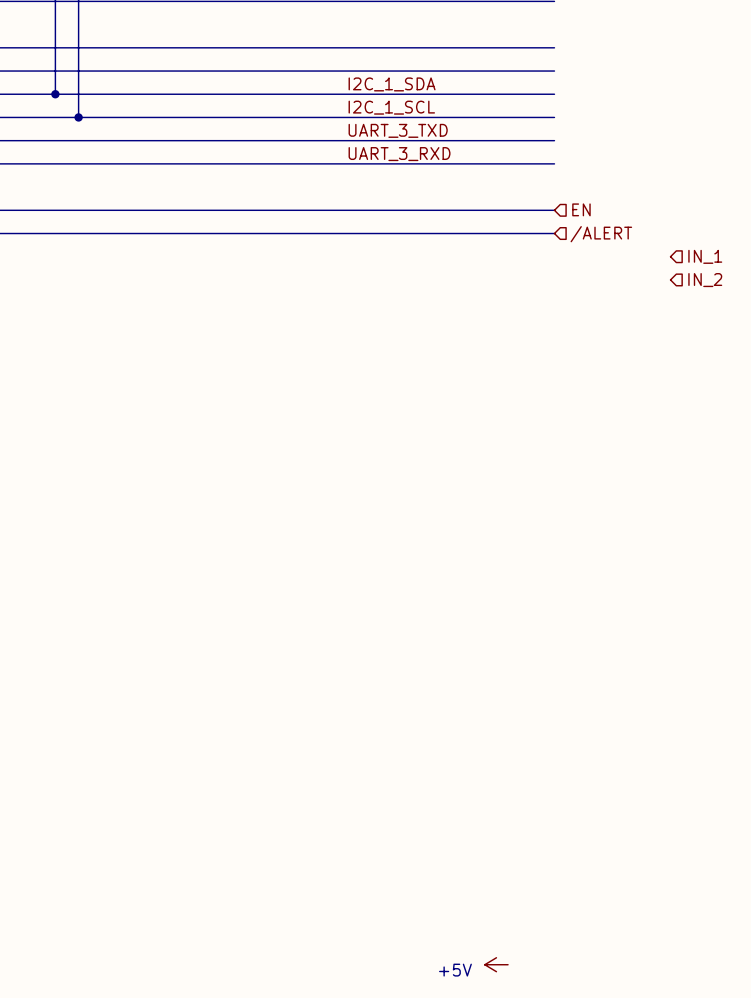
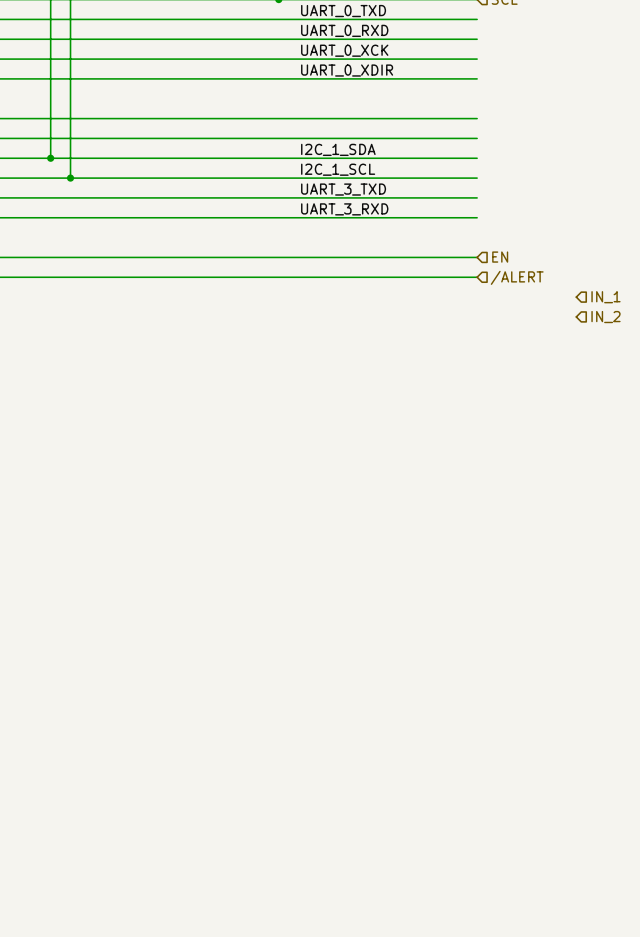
power symbol: +5V (496, 964) -> none

